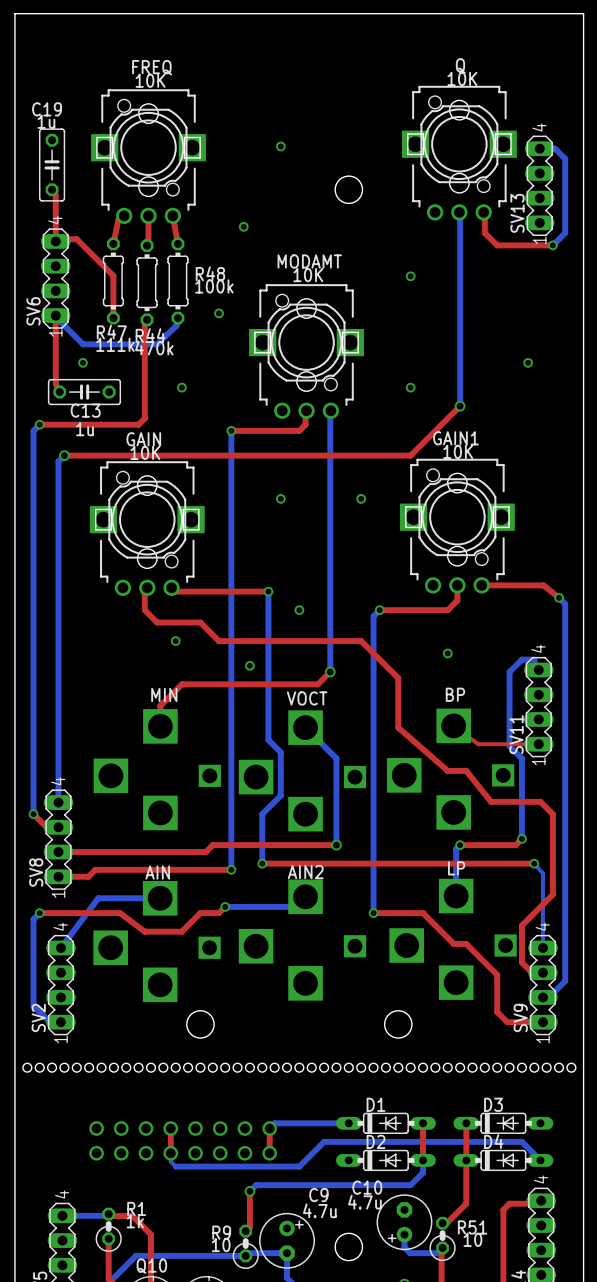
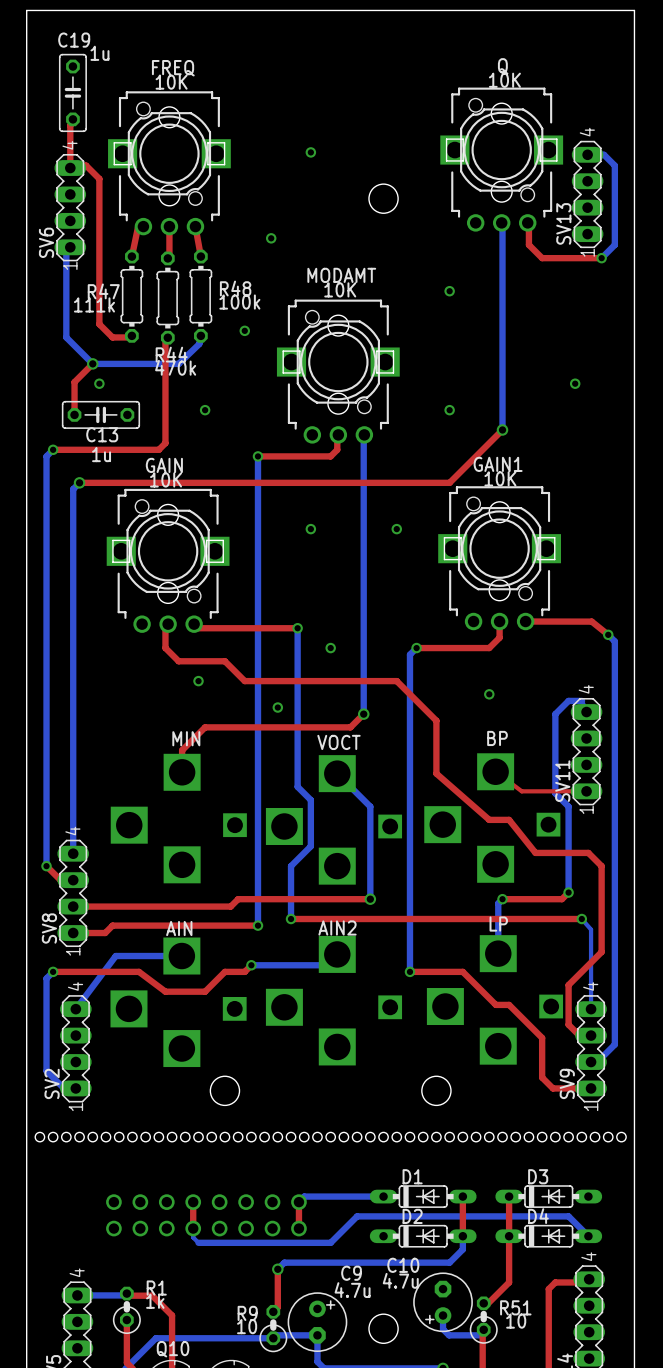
C19 name position: C19 (47, 109) -> C19 (74, 40)
C19 value position: 1u (46, 121) -> 1u (99, 53)
C19 position: (52, 165) -> (72, 92)
top track: (52, 189) (55, 195) (55, 241) (58, 239) (76, 239) (113, 275) (113, 318) -> (72, 119) (70, 125) (70, 168) (72, 165) (86, 165) (99, 178) (99, 324) (112, 337) (132, 337) (131, 335)
SV6 position: (55, 278) -> (70, 207)
bottom track: (55, 315) (82, 344) -> (70, 247) (66, 251) (66, 337) (92, 363) (99, 363)
top track: (55, 315) (55, 383) (59, 392) -> (92, 363) (74, 382) (74, 414)
R47 name position: R47 (111, 332) -> R47 (103, 291)
via: none -> (92, 363)
R47 value position: 111k (115, 344) -> 111k (94, 304)

